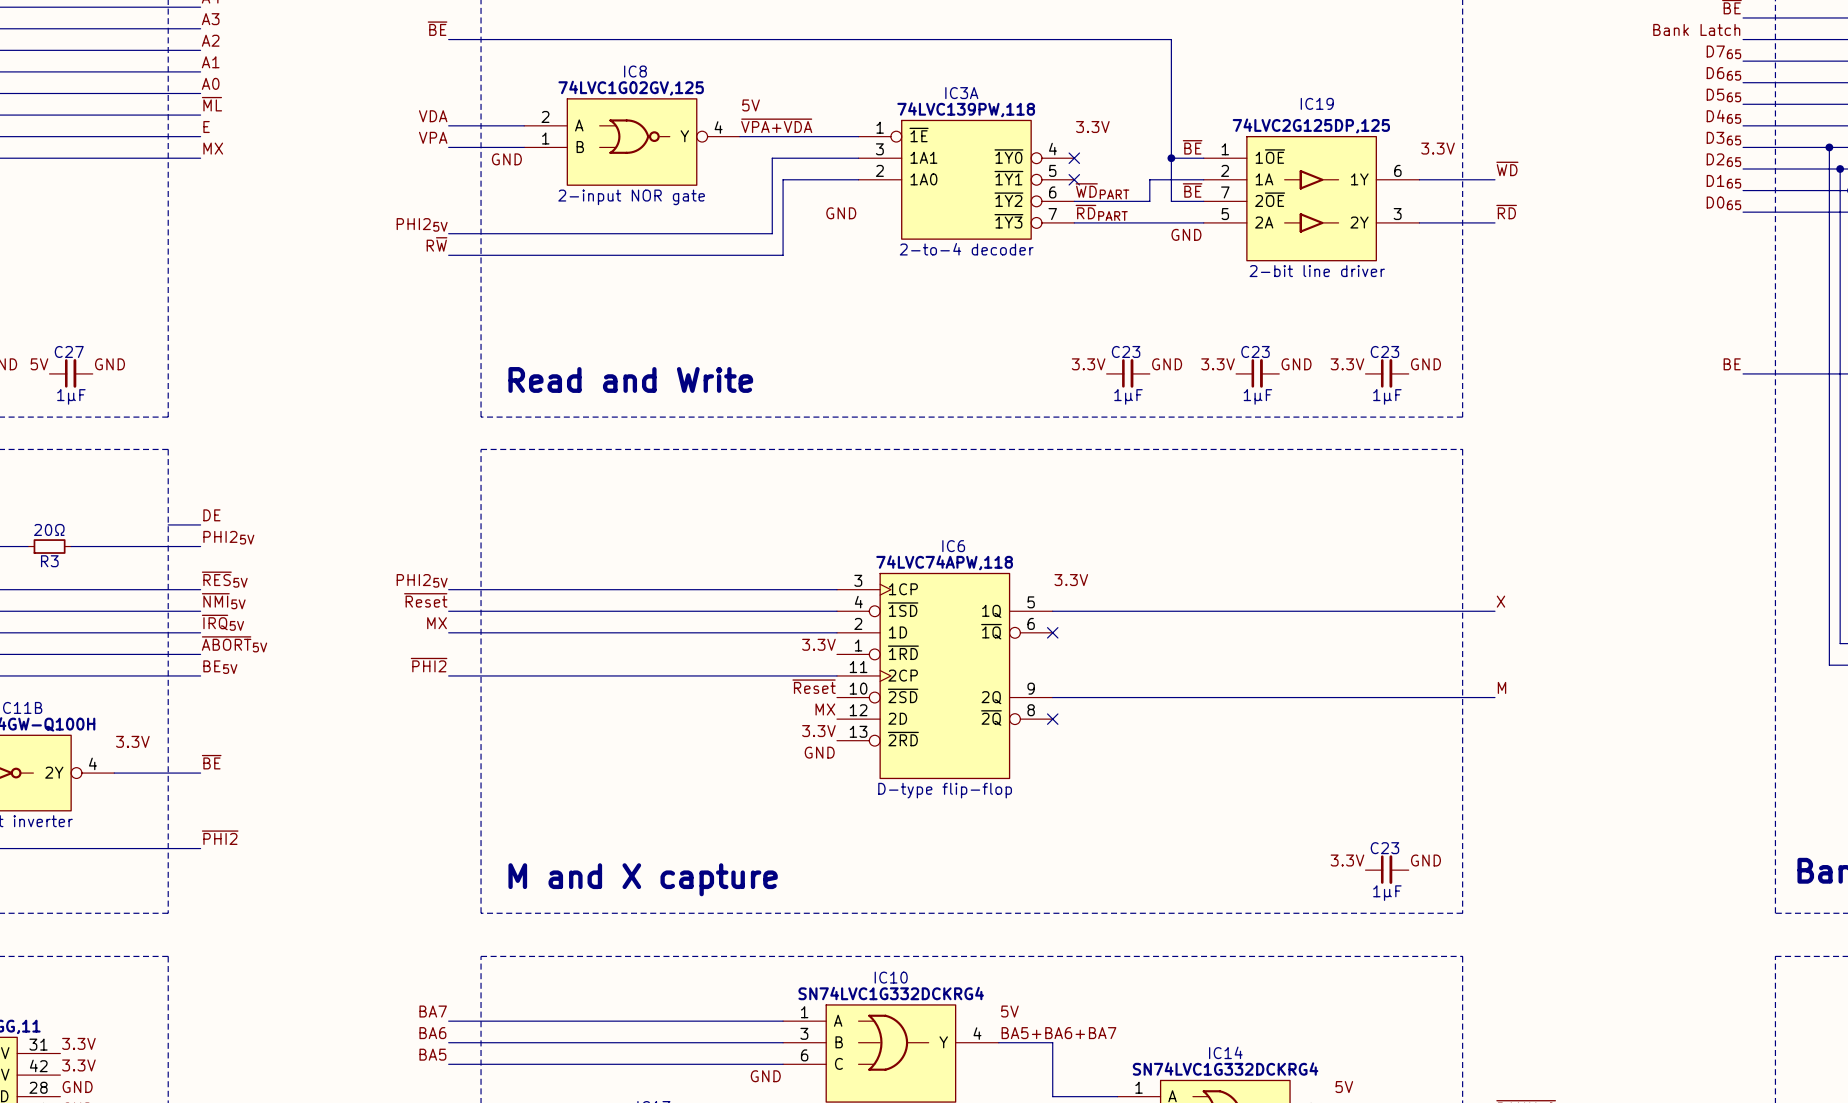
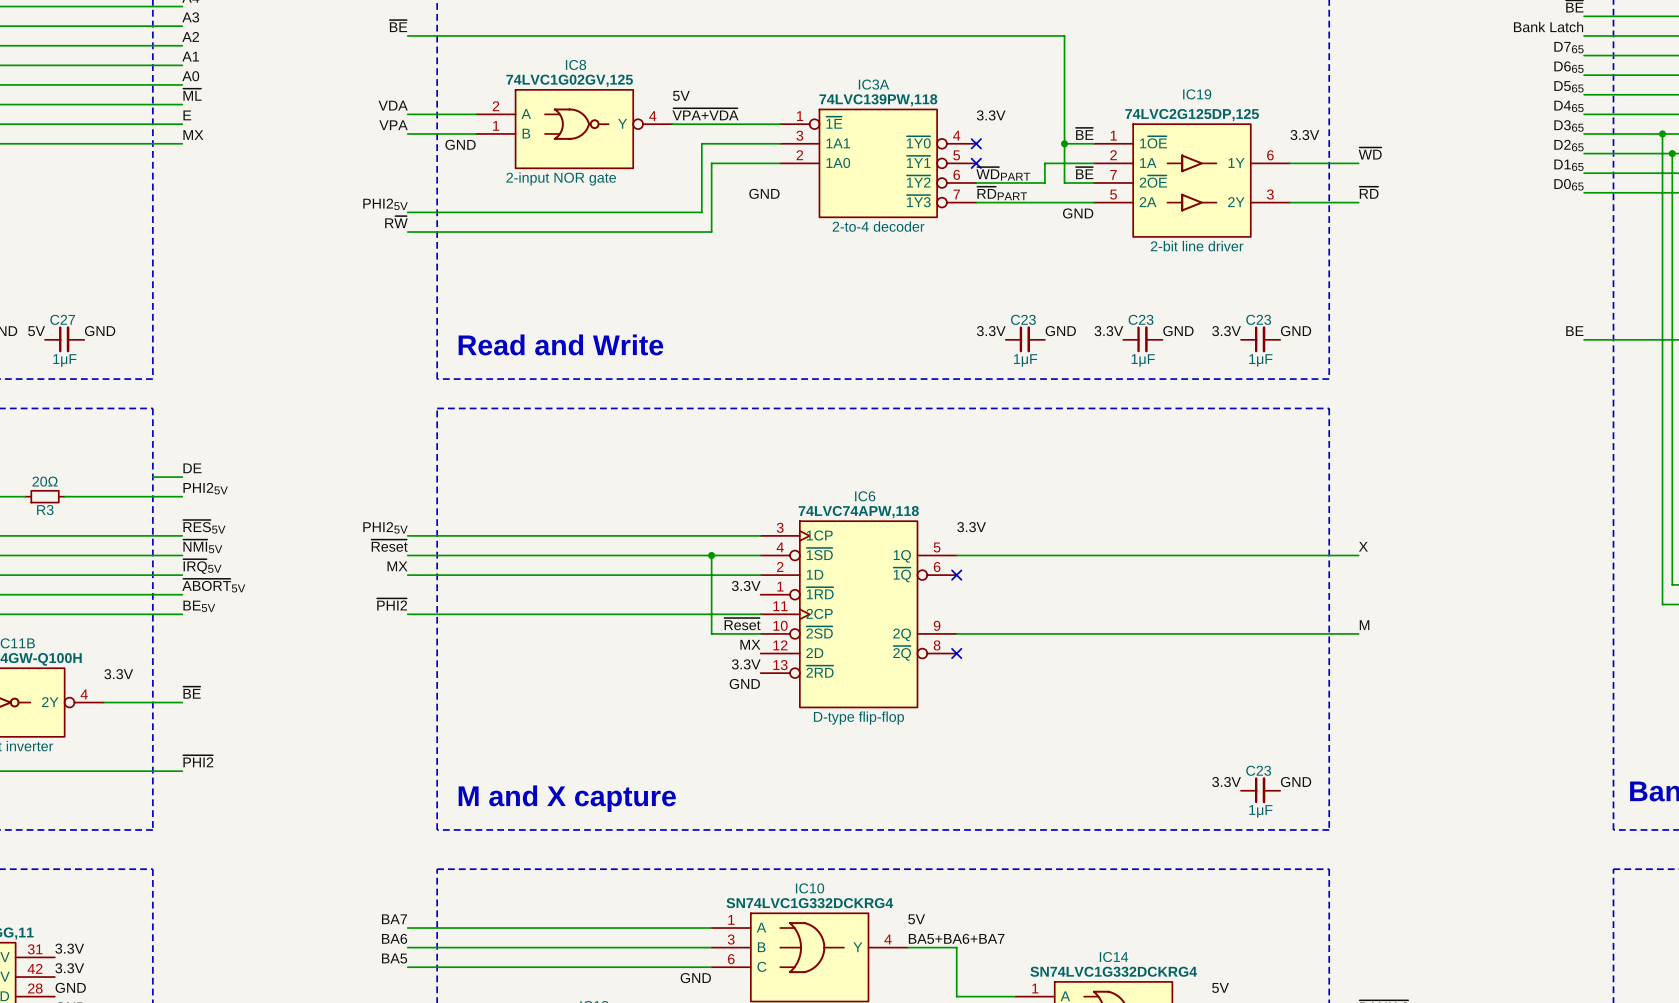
wire: none -> (711, 555) (711, 633) (760, 633)
junction: none -> (711, 555)

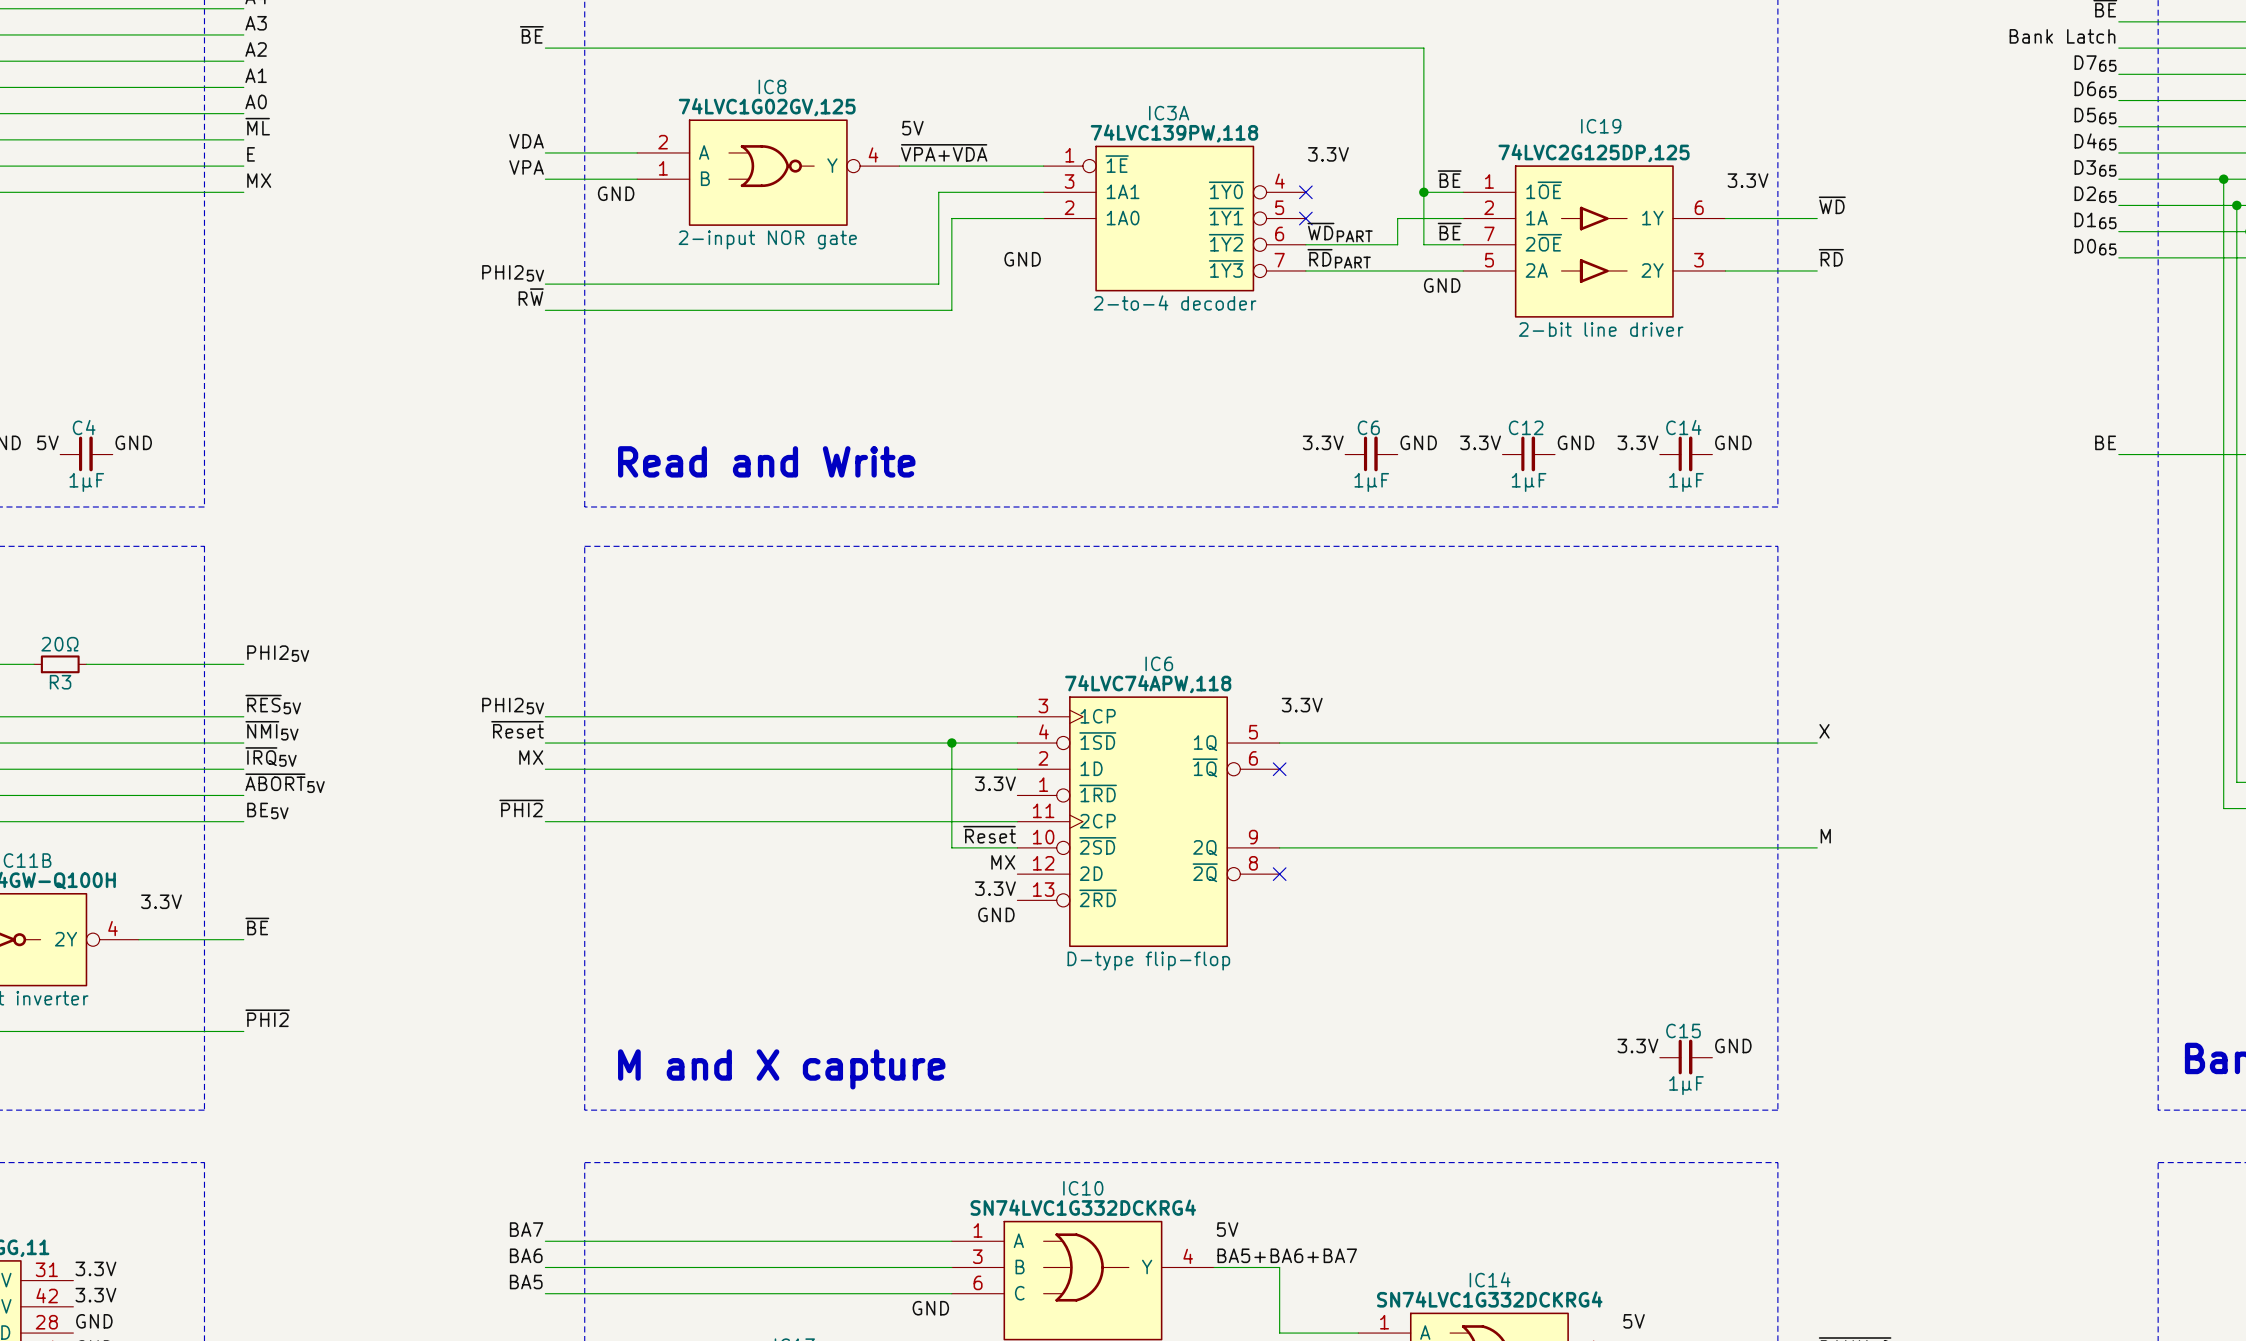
C27 name: C27 (62, 319) -> C4 (84, 427)
C23 name: C23 (1023, 319) -> C6 (1368, 427)
C23 name: C23 (1141, 319) -> C12 (1526, 427)
C23 name: C23 (1258, 319) -> C14 (1683, 427)
label: DE (192, 468) -> none
wire: (152, 477) (182, 477) -> none
C23 name: C23 (1258, 770) -> C15 (1683, 1030)

